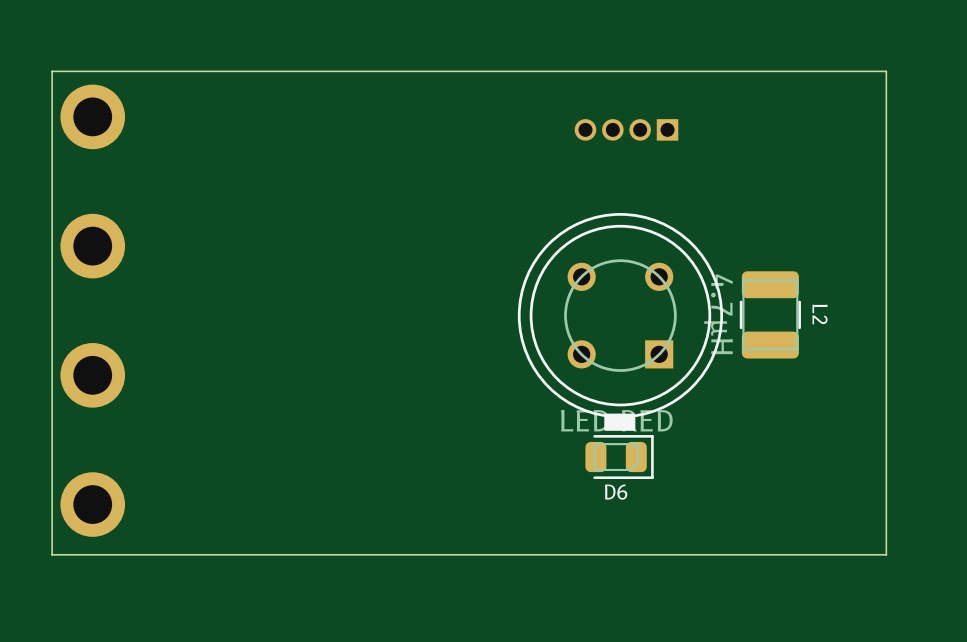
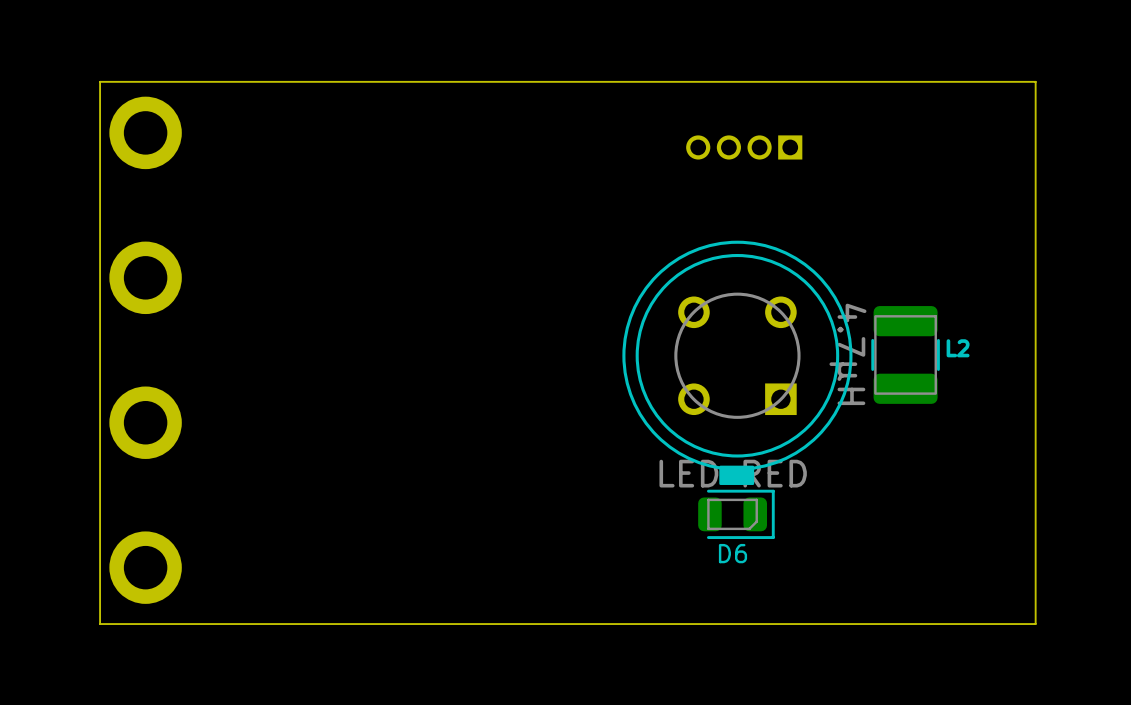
L2 name rotation: 0° (820, 314) -> 90° counterclockwise (958, 348)

